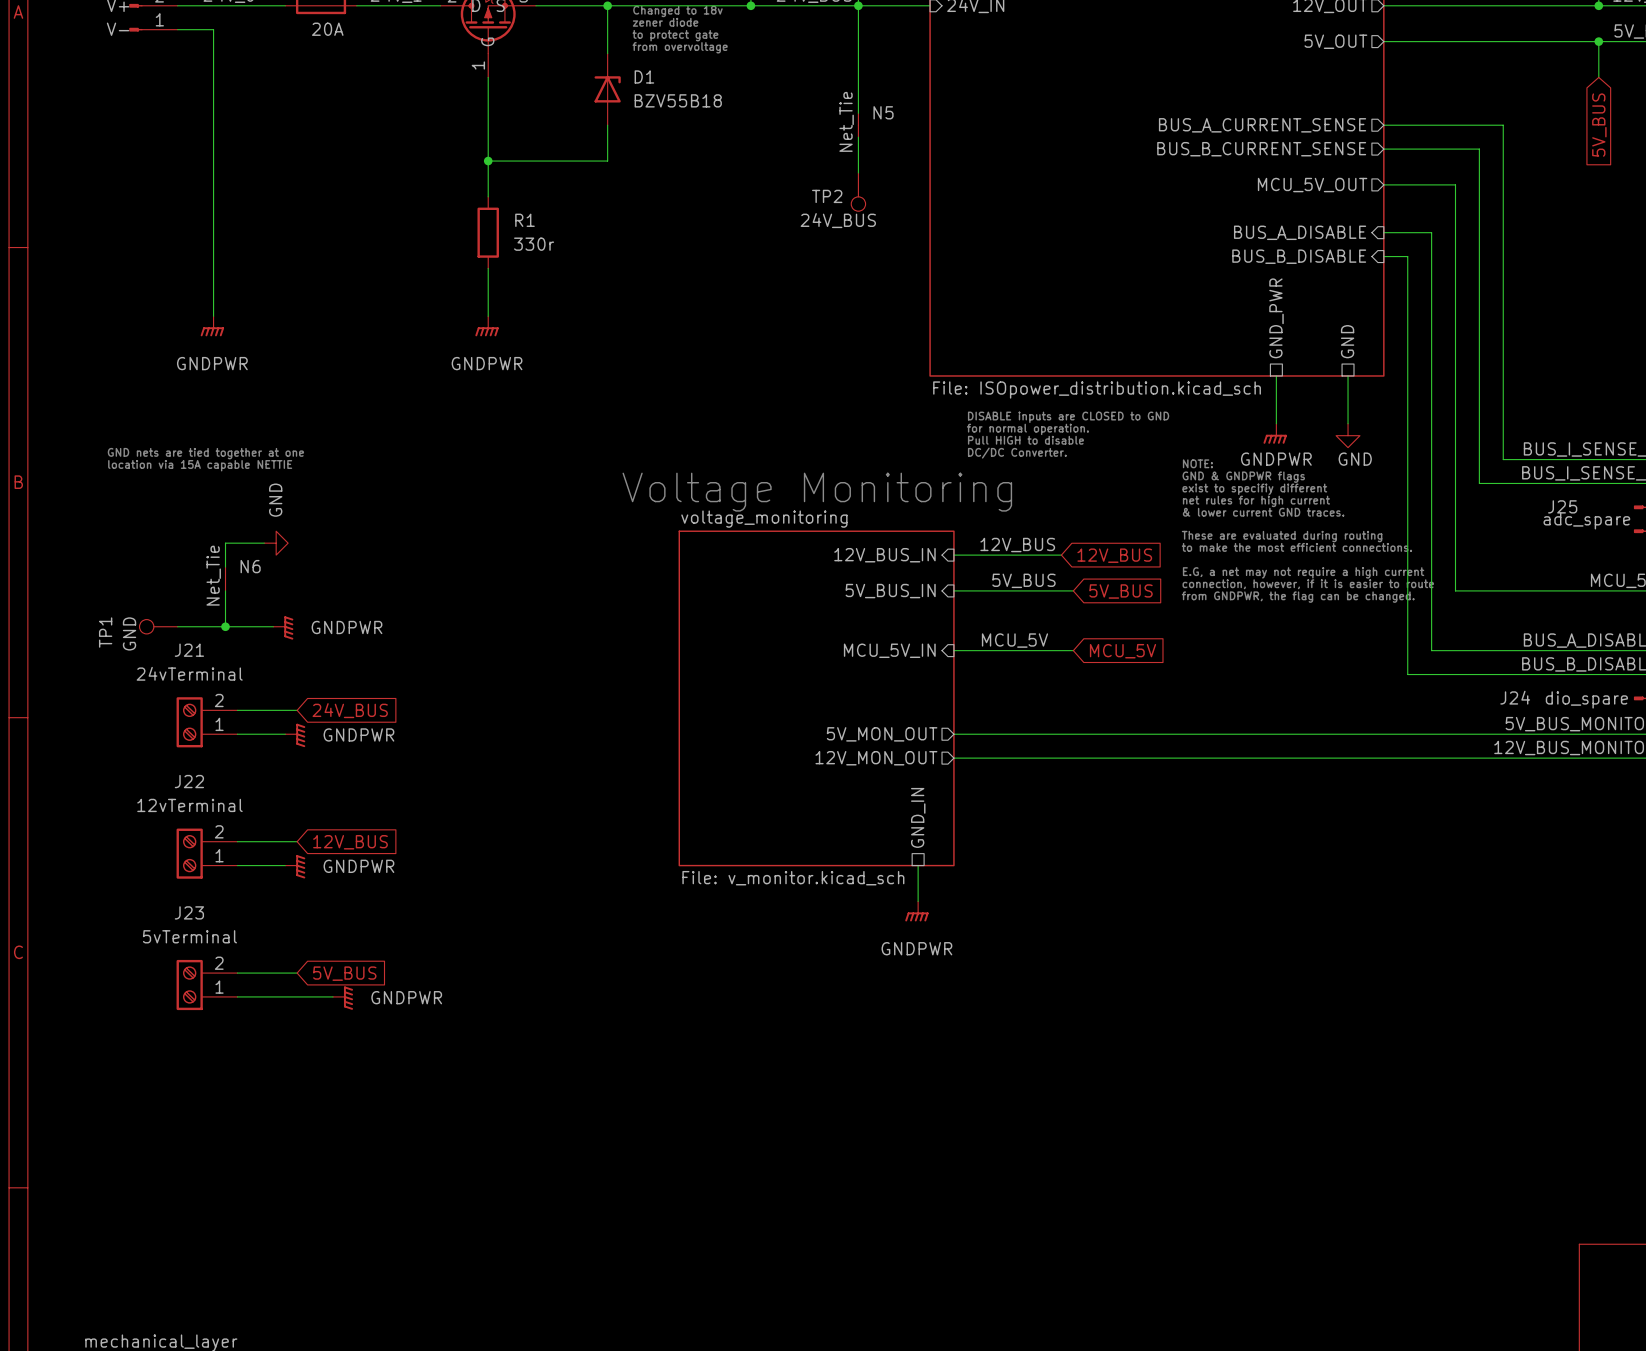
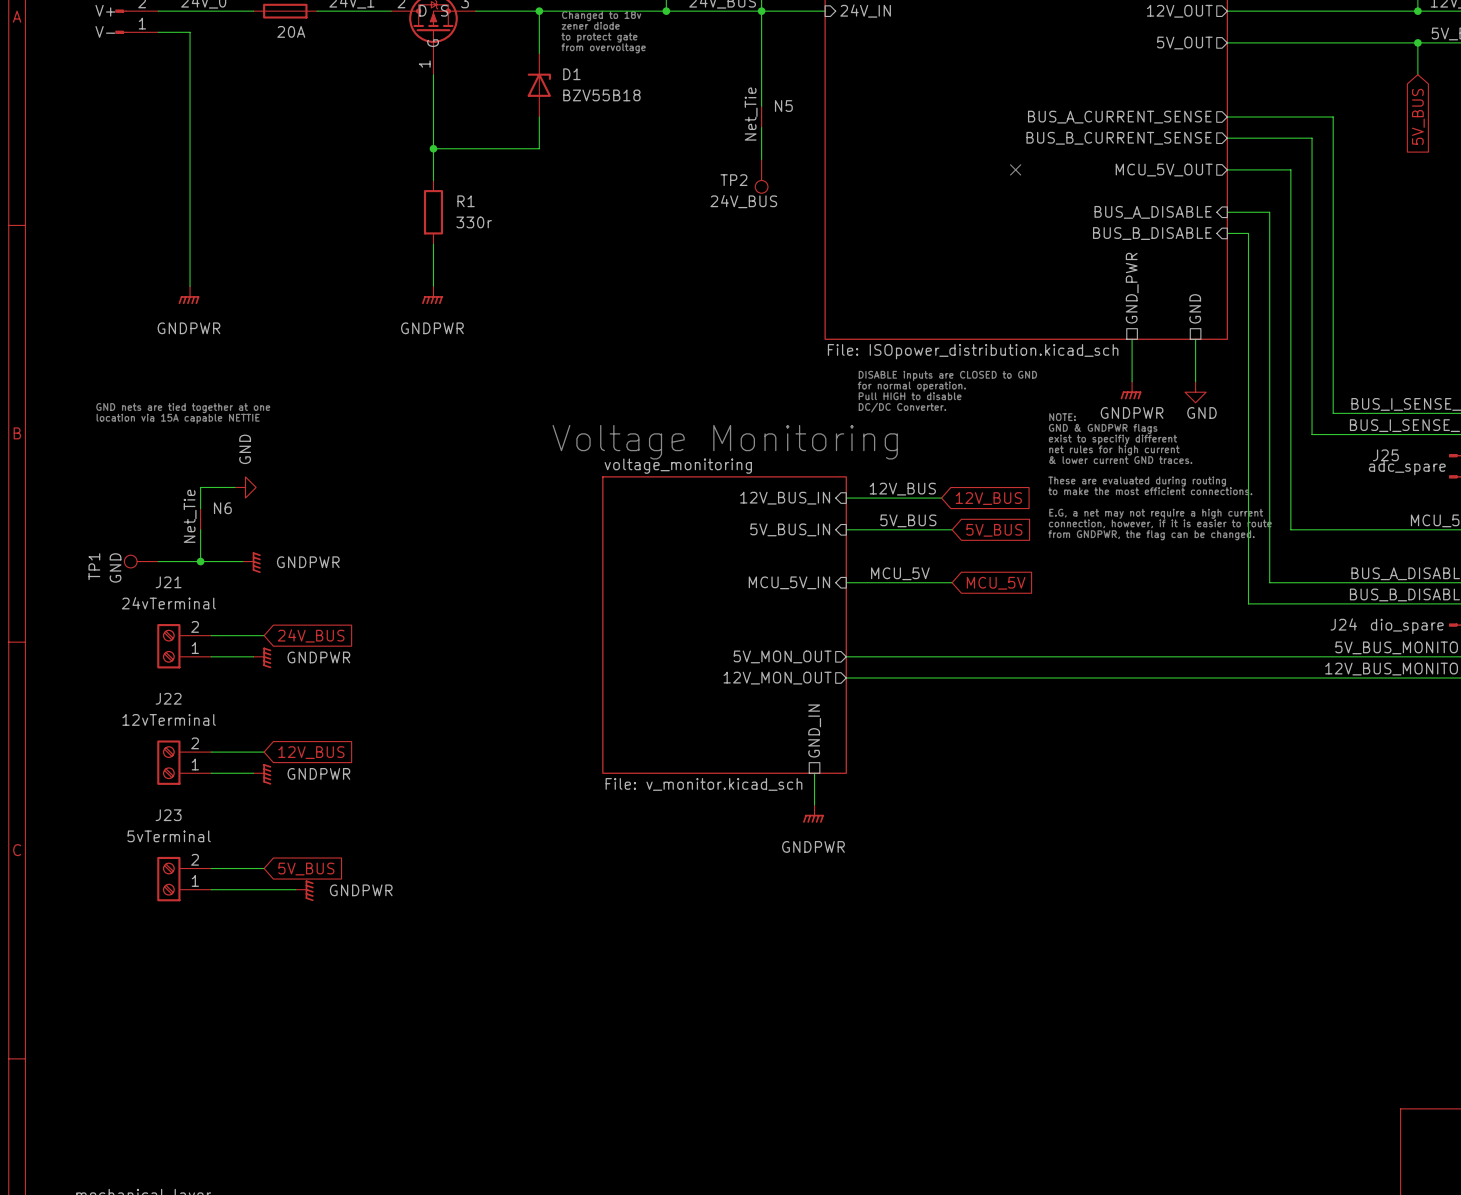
no-connect mark: none -> (1015, 169)

